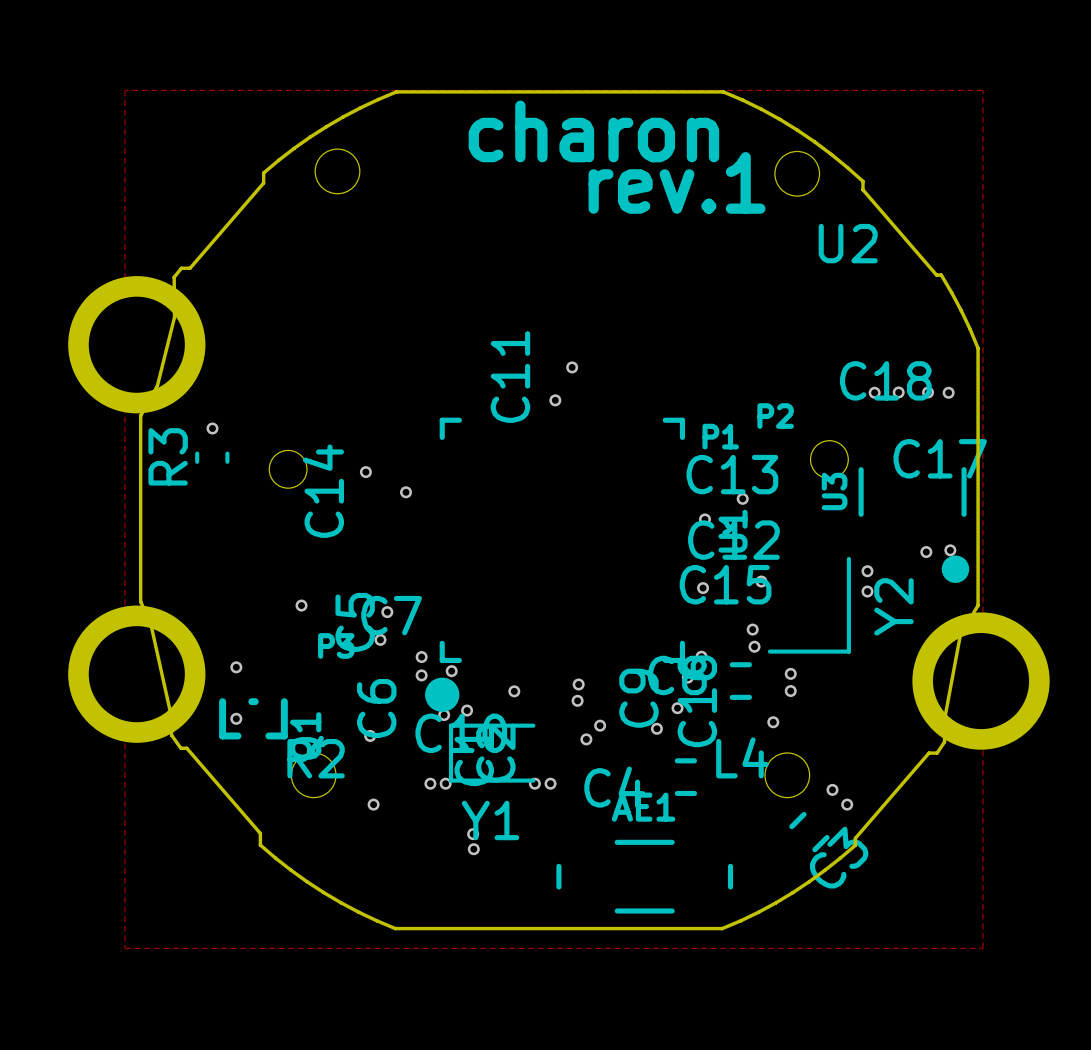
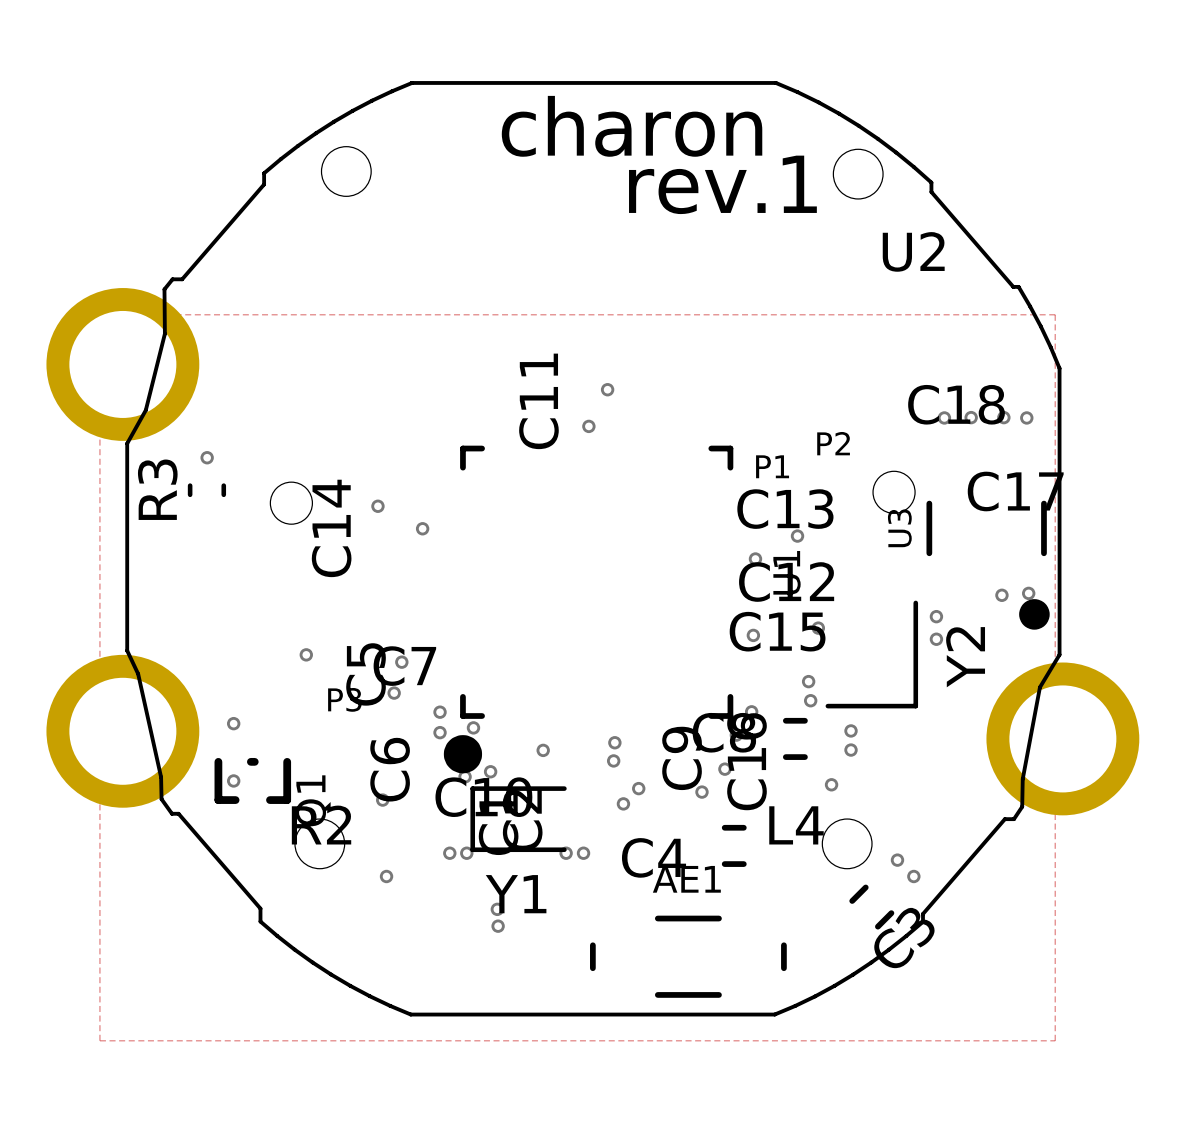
zone outline: (124, 90) (124, 948) (982, 948) (982, 90) (124, 90) -> (99, 314) (99, 1040) (1055, 1040) (1055, 314) (99, 314)

